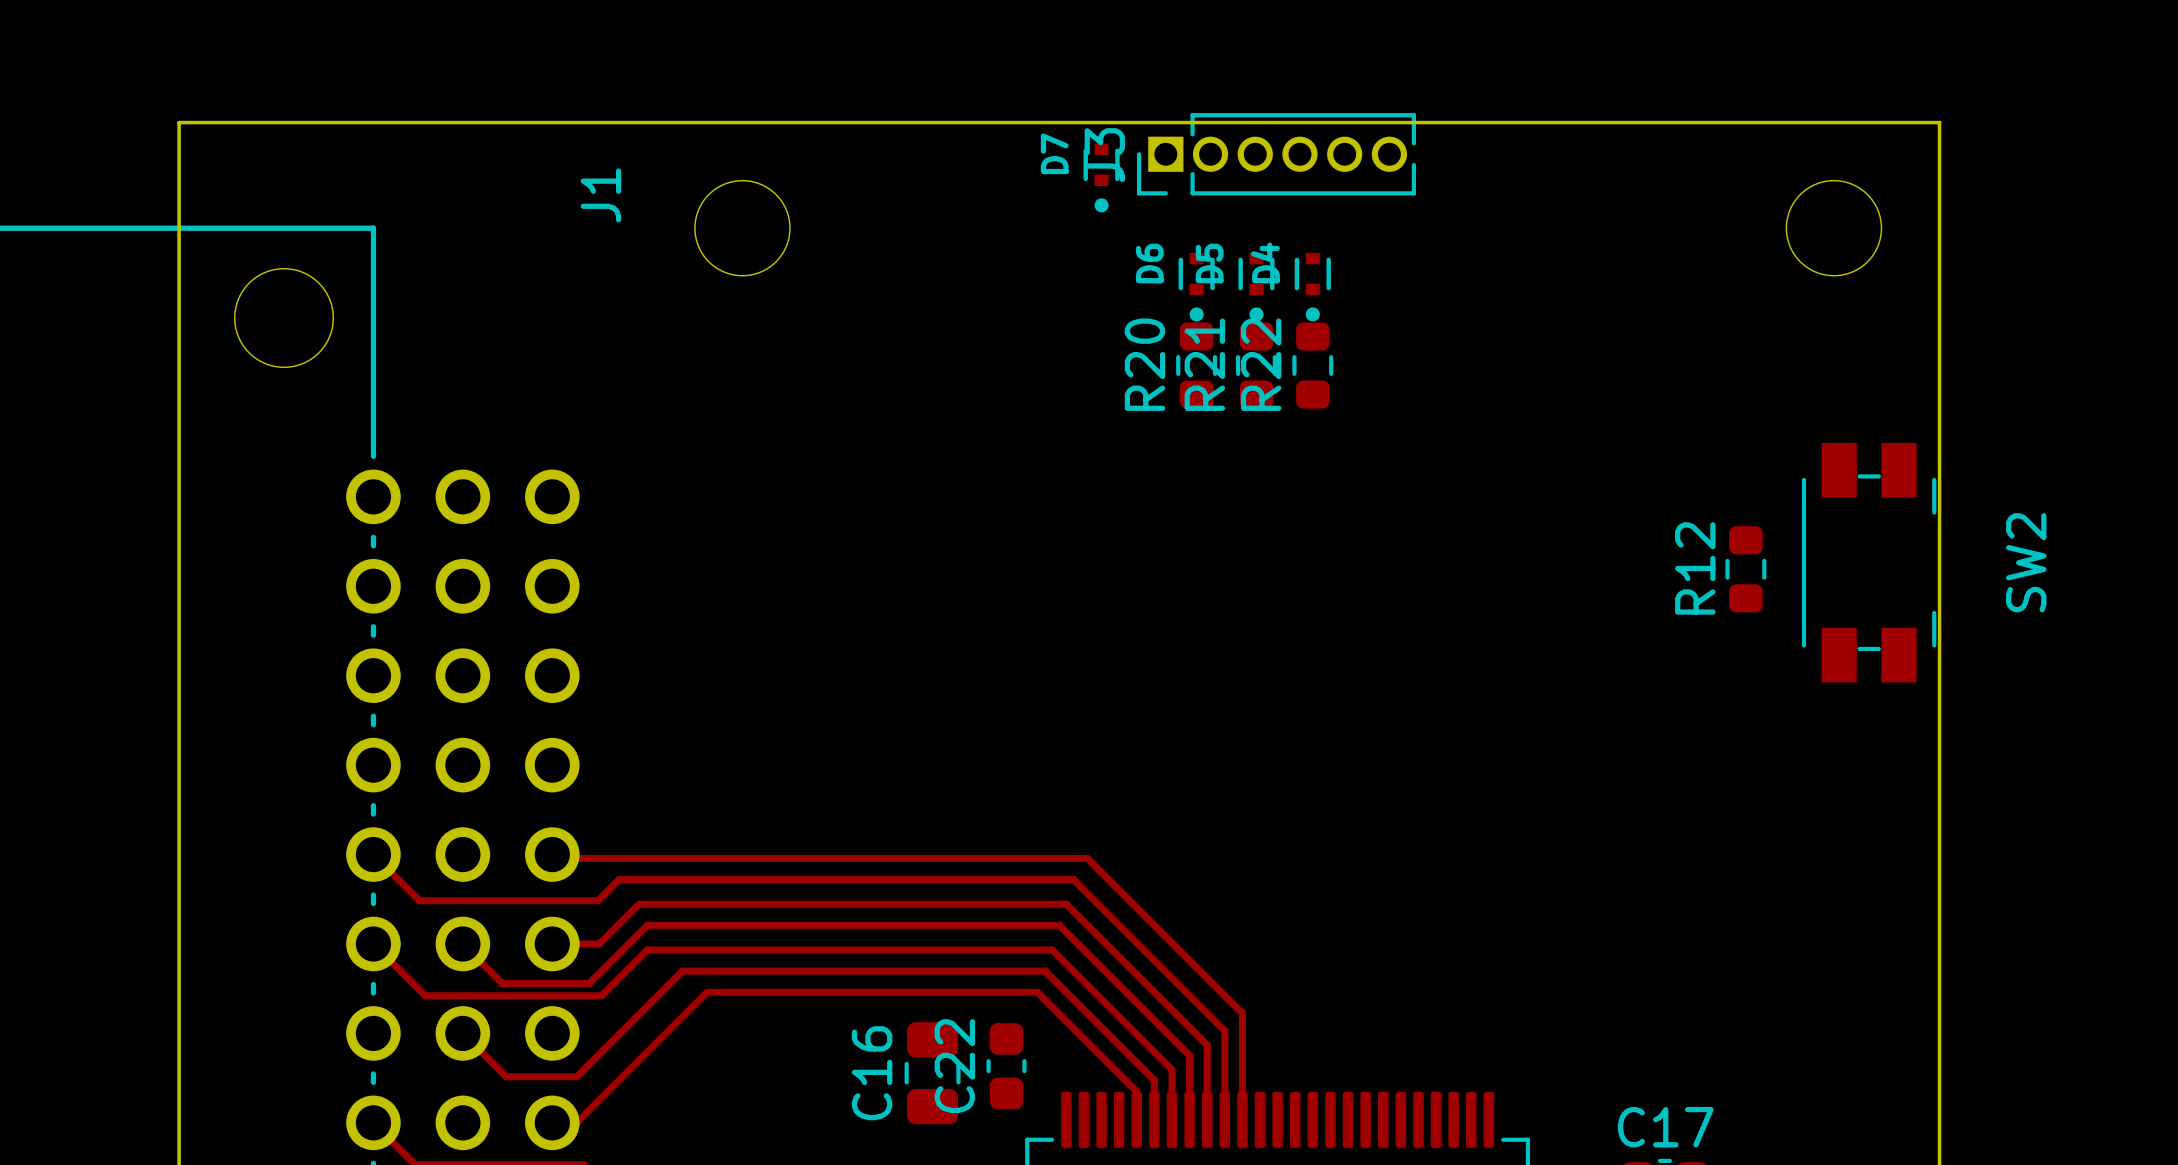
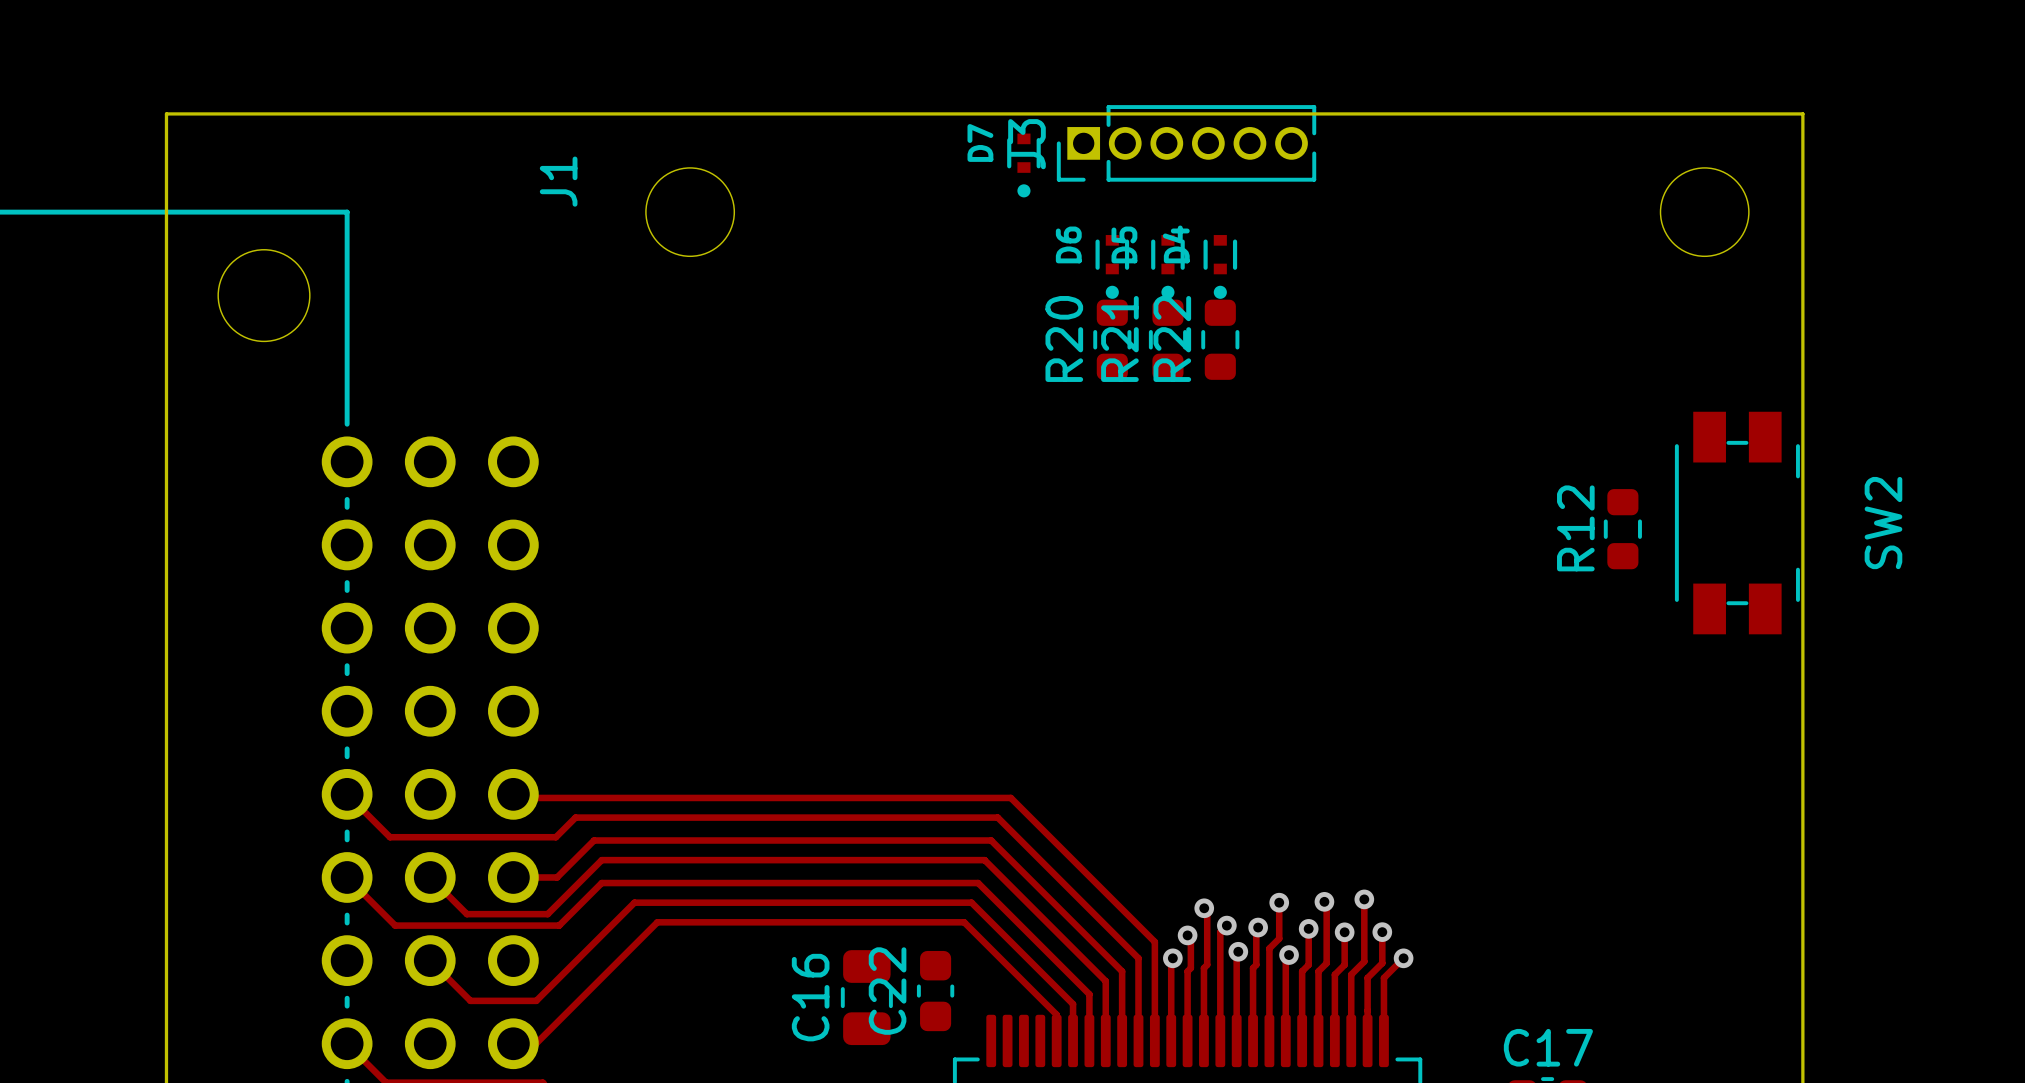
track: none -> (1364, 899) (1364, 961) (1351, 974) (1351, 1040)
via: none -> (1364, 899)
track: none -> (1324, 901) (1326, 904) (1326, 963) (1318, 971) (1318, 1040)
via: none -> (1324, 901)
track: none -> (1279, 902) (1279, 938) (1269, 948) (1269, 1040)
via: none -> (1279, 902)
track: none -> (1204, 908) (1207, 911) (1207, 964) (1203, 968) (1203, 1040)
via: none -> (1204, 908)
track: none -> (1226, 925) (1220, 932) (1220, 1040)
via: none -> (1226, 925)
track: none -> (1258, 927) (1256, 929) (1256, 964) (1253, 968) (1253, 1040)
via: none -> (1258, 927)
track: none -> (1308, 928) (1308, 964) (1302, 971) (1302, 1040)
via: none -> (1308, 928)
track: none -> (1344, 932) (1344, 964) (1334, 974) (1334, 1040)
via: none -> (1344, 932)
track: none -> (1382, 932) (1382, 963) (1367, 977) (1367, 1040)
via: none -> (1382, 932)
track: none -> (1187, 935) (1190, 938) (1190, 968) (1187, 971) (1187, 1040)
via: none -> (1187, 935)
track: none -> (1238, 951) (1236, 953) (1236, 1040)
via: none -> (1238, 951)
track: none -> (1289, 955) (1285, 958) (1285, 1040)
via: none -> (1289, 955)
track: none -> (1172, 958) (1171, 959) (1171, 1040)
via: none -> (1172, 958)
track: none -> (1403, 958) (1383, 977) (1383, 1040)
via: none -> (1403, 958)

